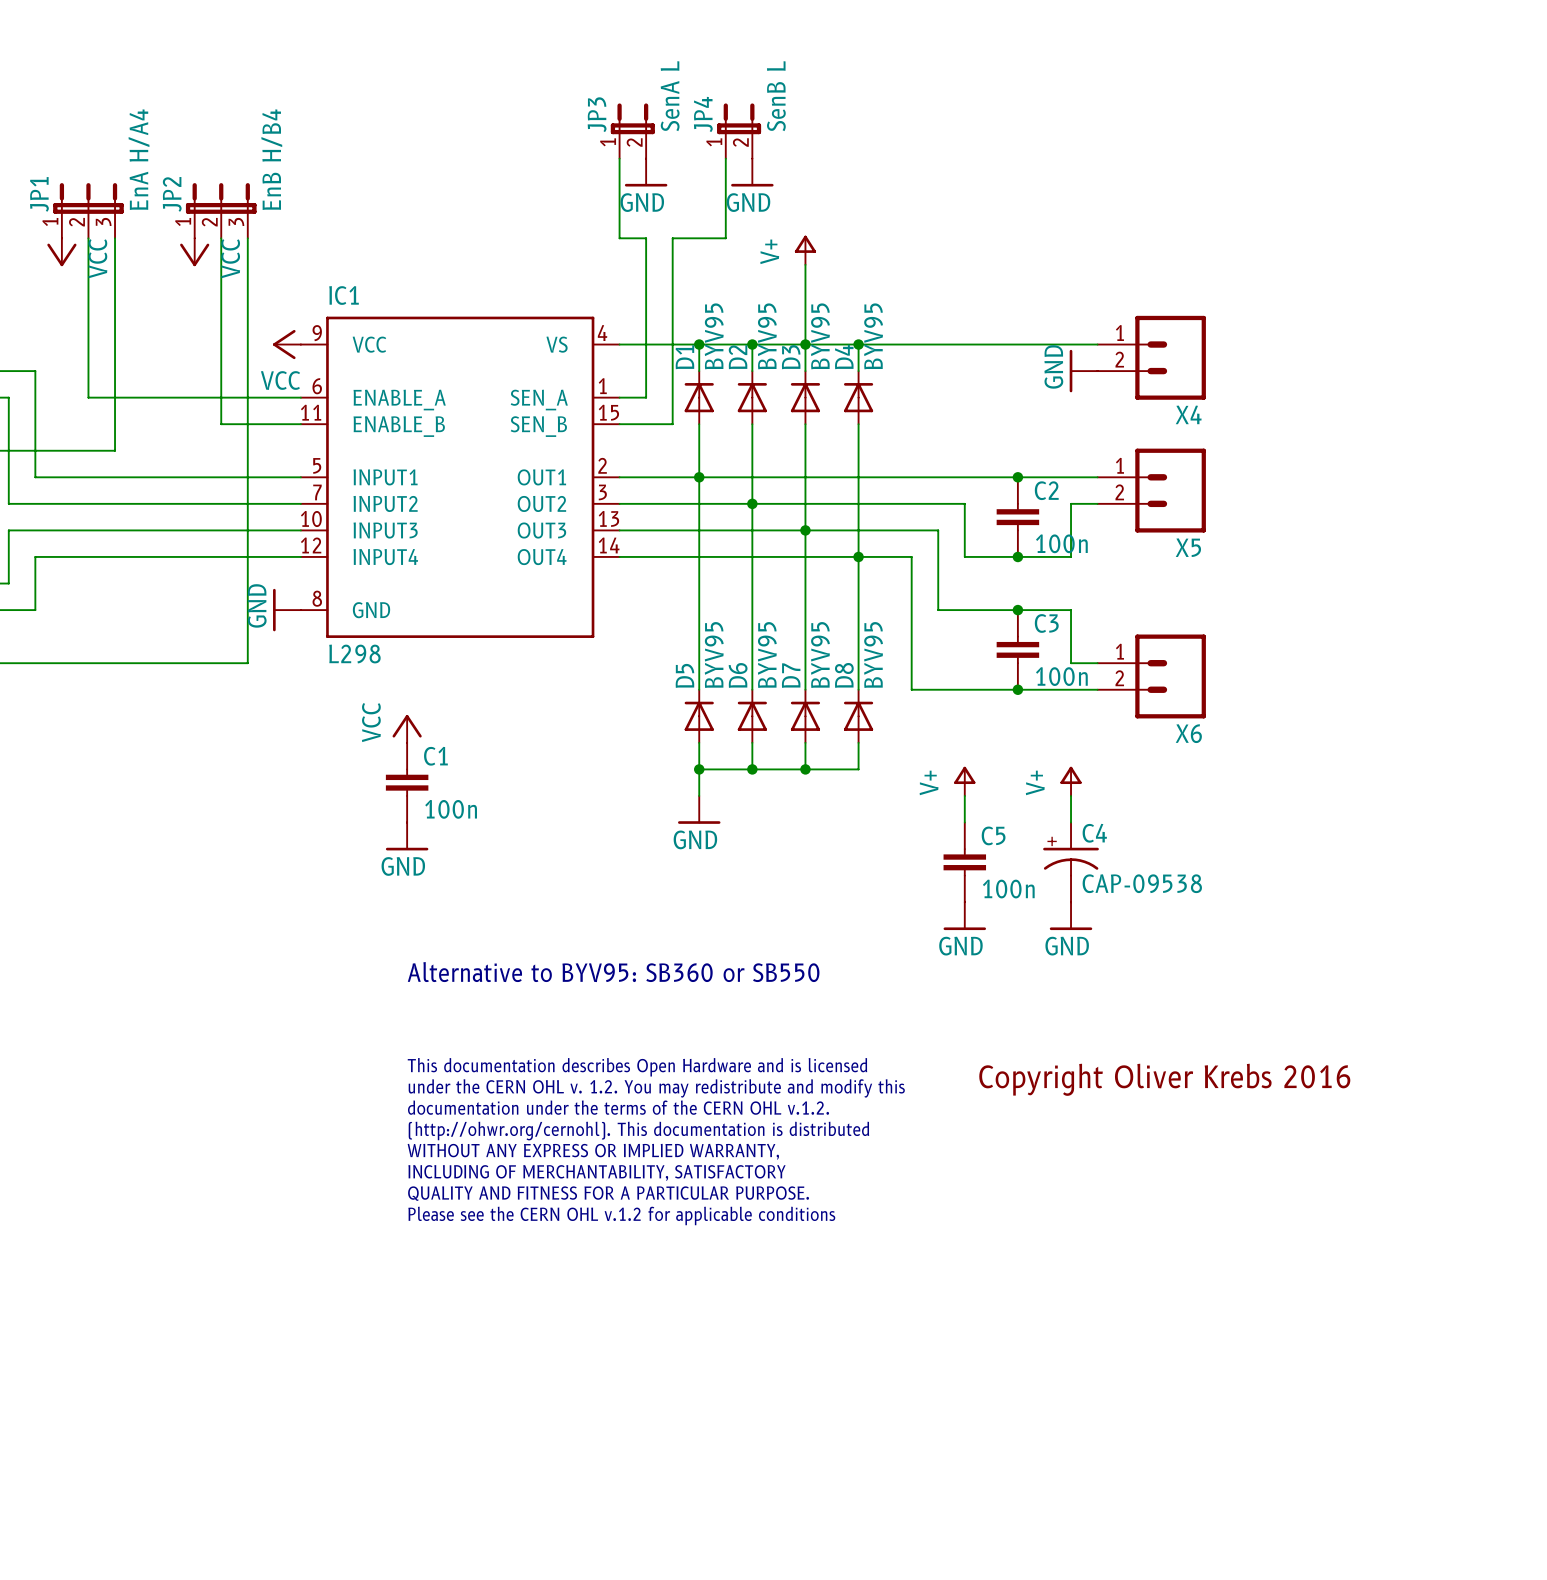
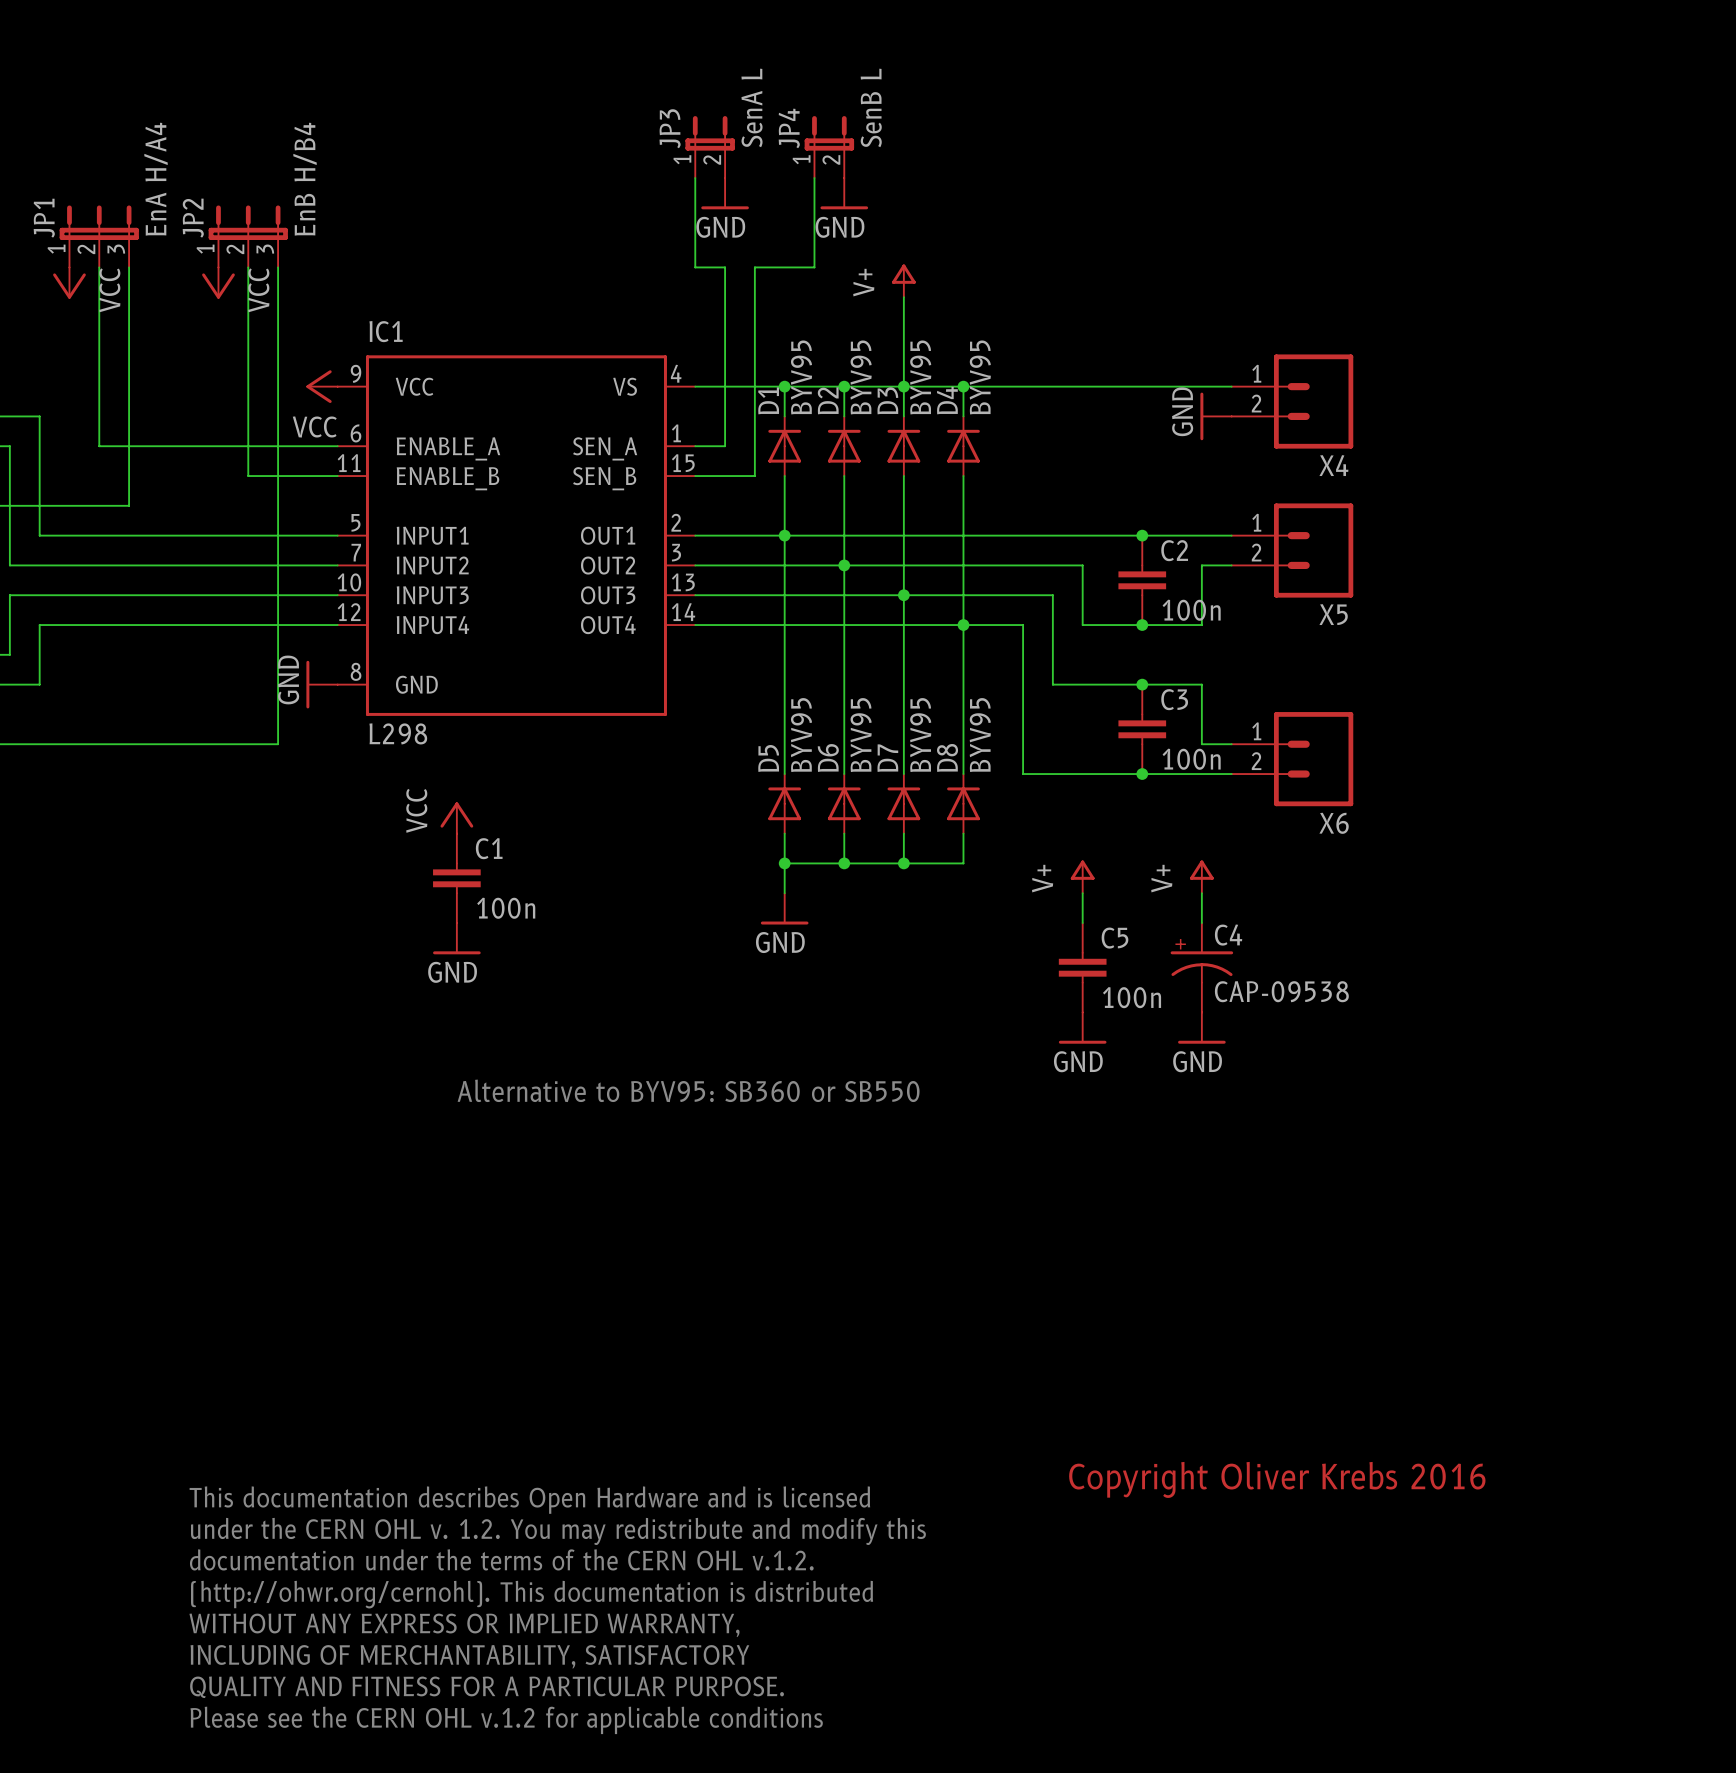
text: This documentation describes Open Hardware and is licensed (637, 1067) -> none
text position: Copyright Oliver Krebs 2016 (1164, 1079) -> Copyright Oliver Krebs 2016 (1277, 1479)
text: under the CERN OHL v. 1.2. You may redistribute and modify this (656, 1088) -> none
text: documentation under the terms of the CERN OHL v.1.2. (618, 1107) -> none
text: (http://ohwr.org/cernohl). This documentation is distributed (638, 1131) -> none
text: WITHOUT ANY EXPRESS OR IMPLIED WARRANTY, (593, 1151) -> none
text: INCLUDING OF MERCHANTABILITY, SATISFACTORY (596, 1173) -> none
text: QUALITY AND FITNESS FOR A PARTICULAR PURPOSE. (608, 1193) -> none
text: Please see the CERN OHL v.1.2 for applicable conditions (621, 1215) -> none
text: none -> This documentation describes Open Hardware and is licensed (529, 1500)
text: none -> under the CERN OHL v. 1.2. You may redistribute and modify this (558, 1531)
text: none -> documentation under the terms of the CERN OHL v.1.2. (501, 1559)
text: none -> (http://ohwr.org/cernohl). This documentation is distributed (532, 1594)
text: none -> WITHOUT ANY EXPRESS OR IMPLIED WARRANTY, (464, 1625)
text: none -> INCLUDING OF MERCHANTABILITY, SATISFACTORY (469, 1656)
text: none -> QUALITY AND FITNESS FOR A PARTICULAR PURPOSE. (487, 1687)
text: none -> Please see the CERN OHL v.1.2 for applicable conditions (506, 1720)

